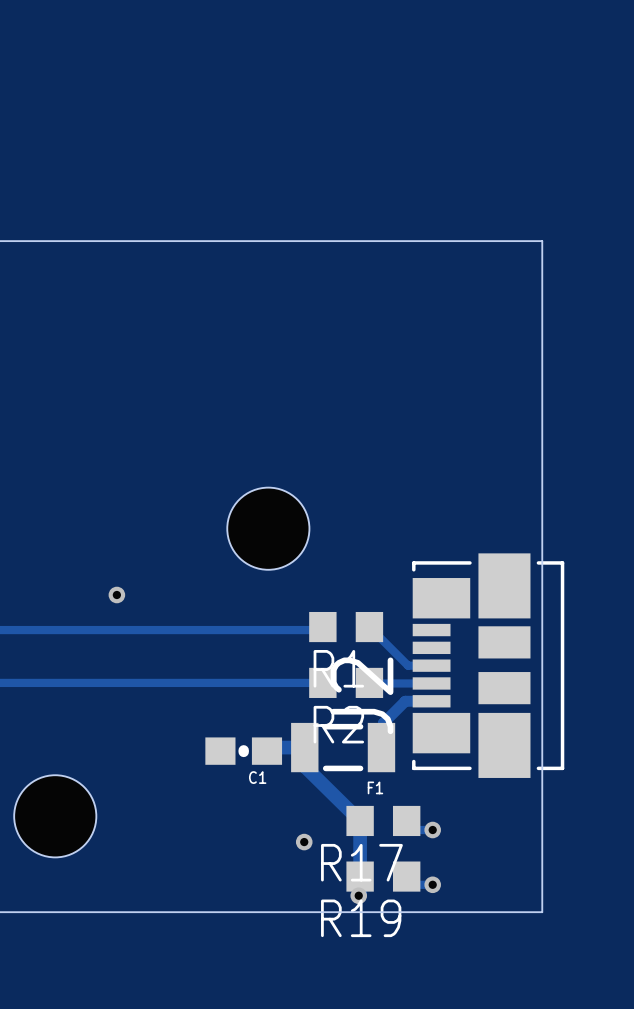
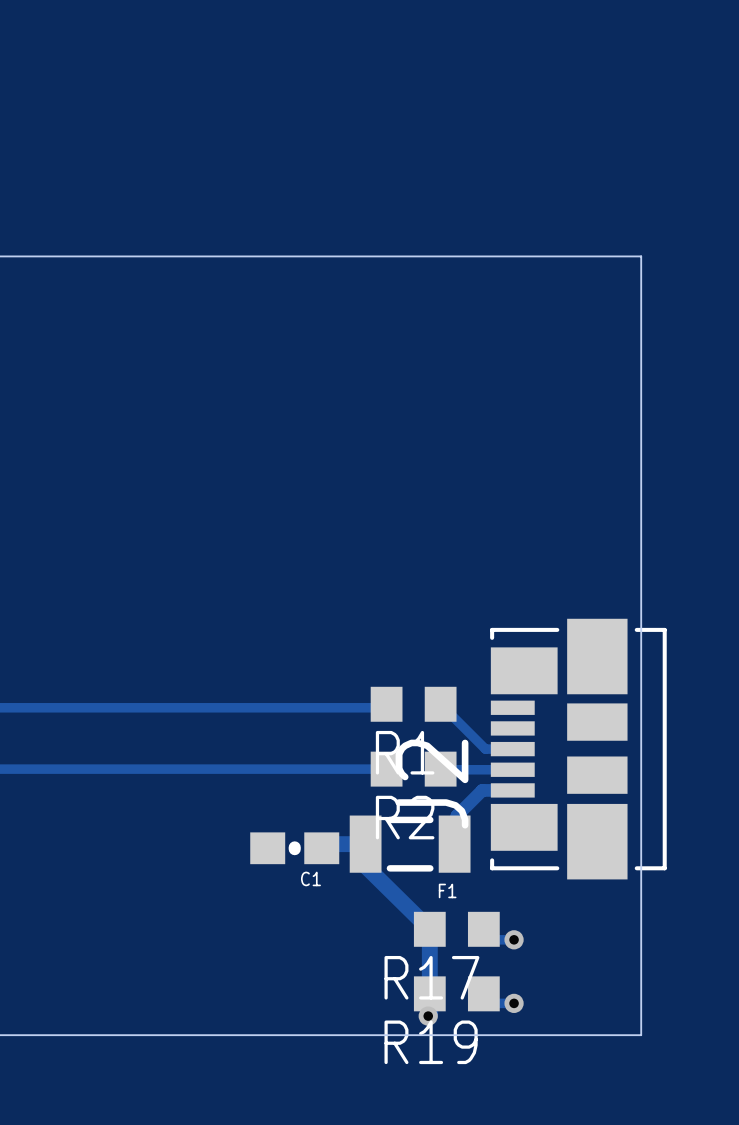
hole: (268, 528) -> none
via: (116, 594) -> none
hole: (55, 816) -> none
via: (304, 842) -> none

